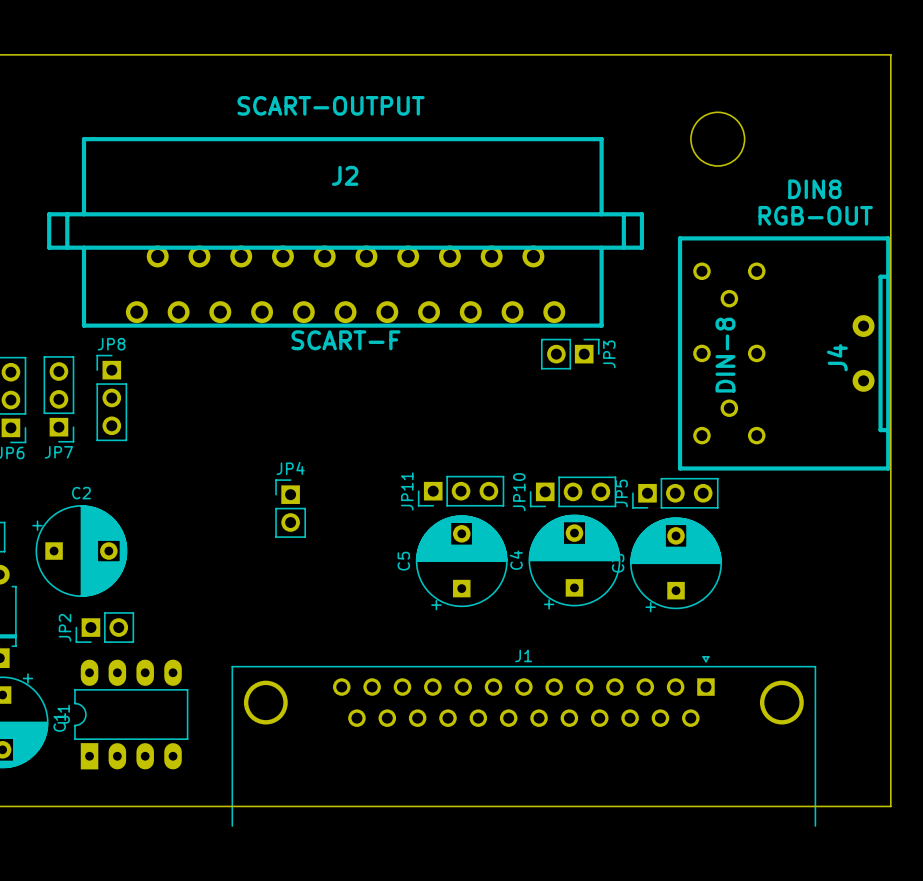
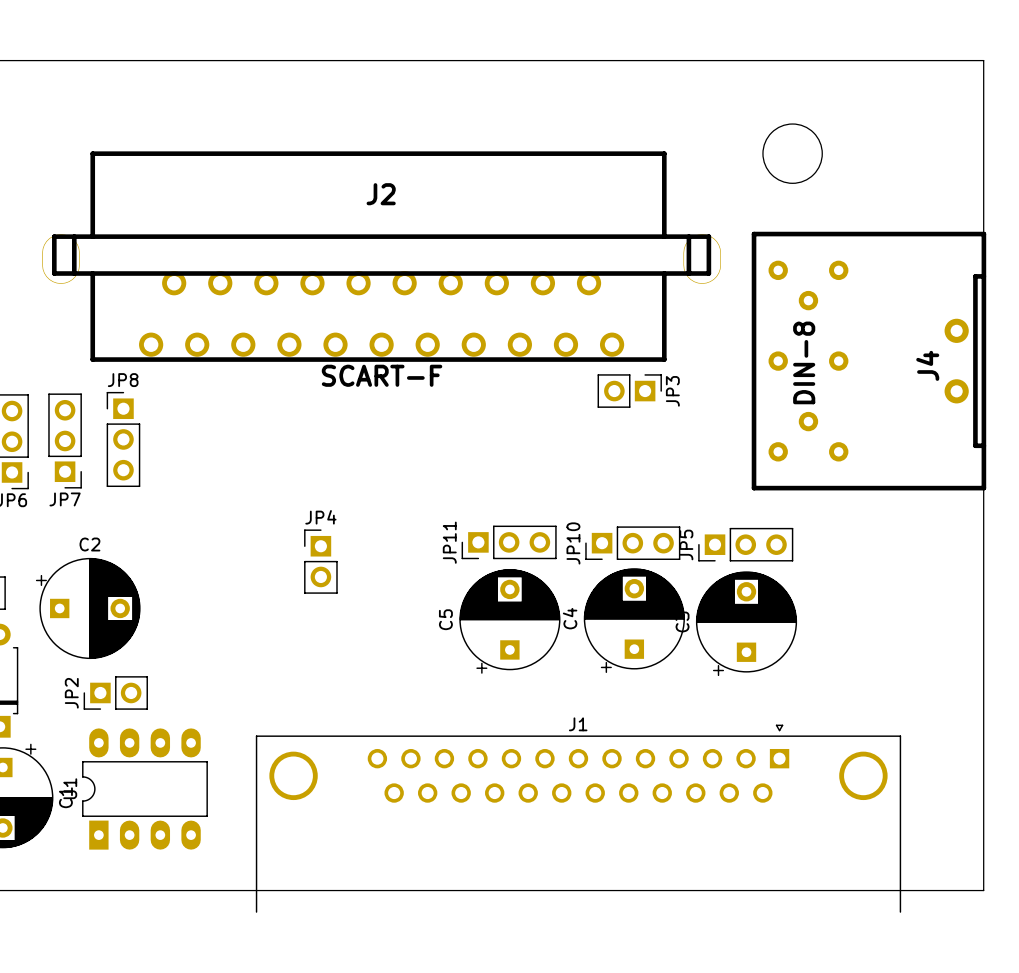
text: SCART-OUTPUT (331, 105) -> none
J2 footprint: [38, 137, 653, 328] -> [42, 151, 721, 362]
text: DIN8 (814, 189) -> none
text: RGB-OUT (815, 215) -> none
J4 footprint: [677, 236, 891, 471] -> [751, 231, 987, 491]

